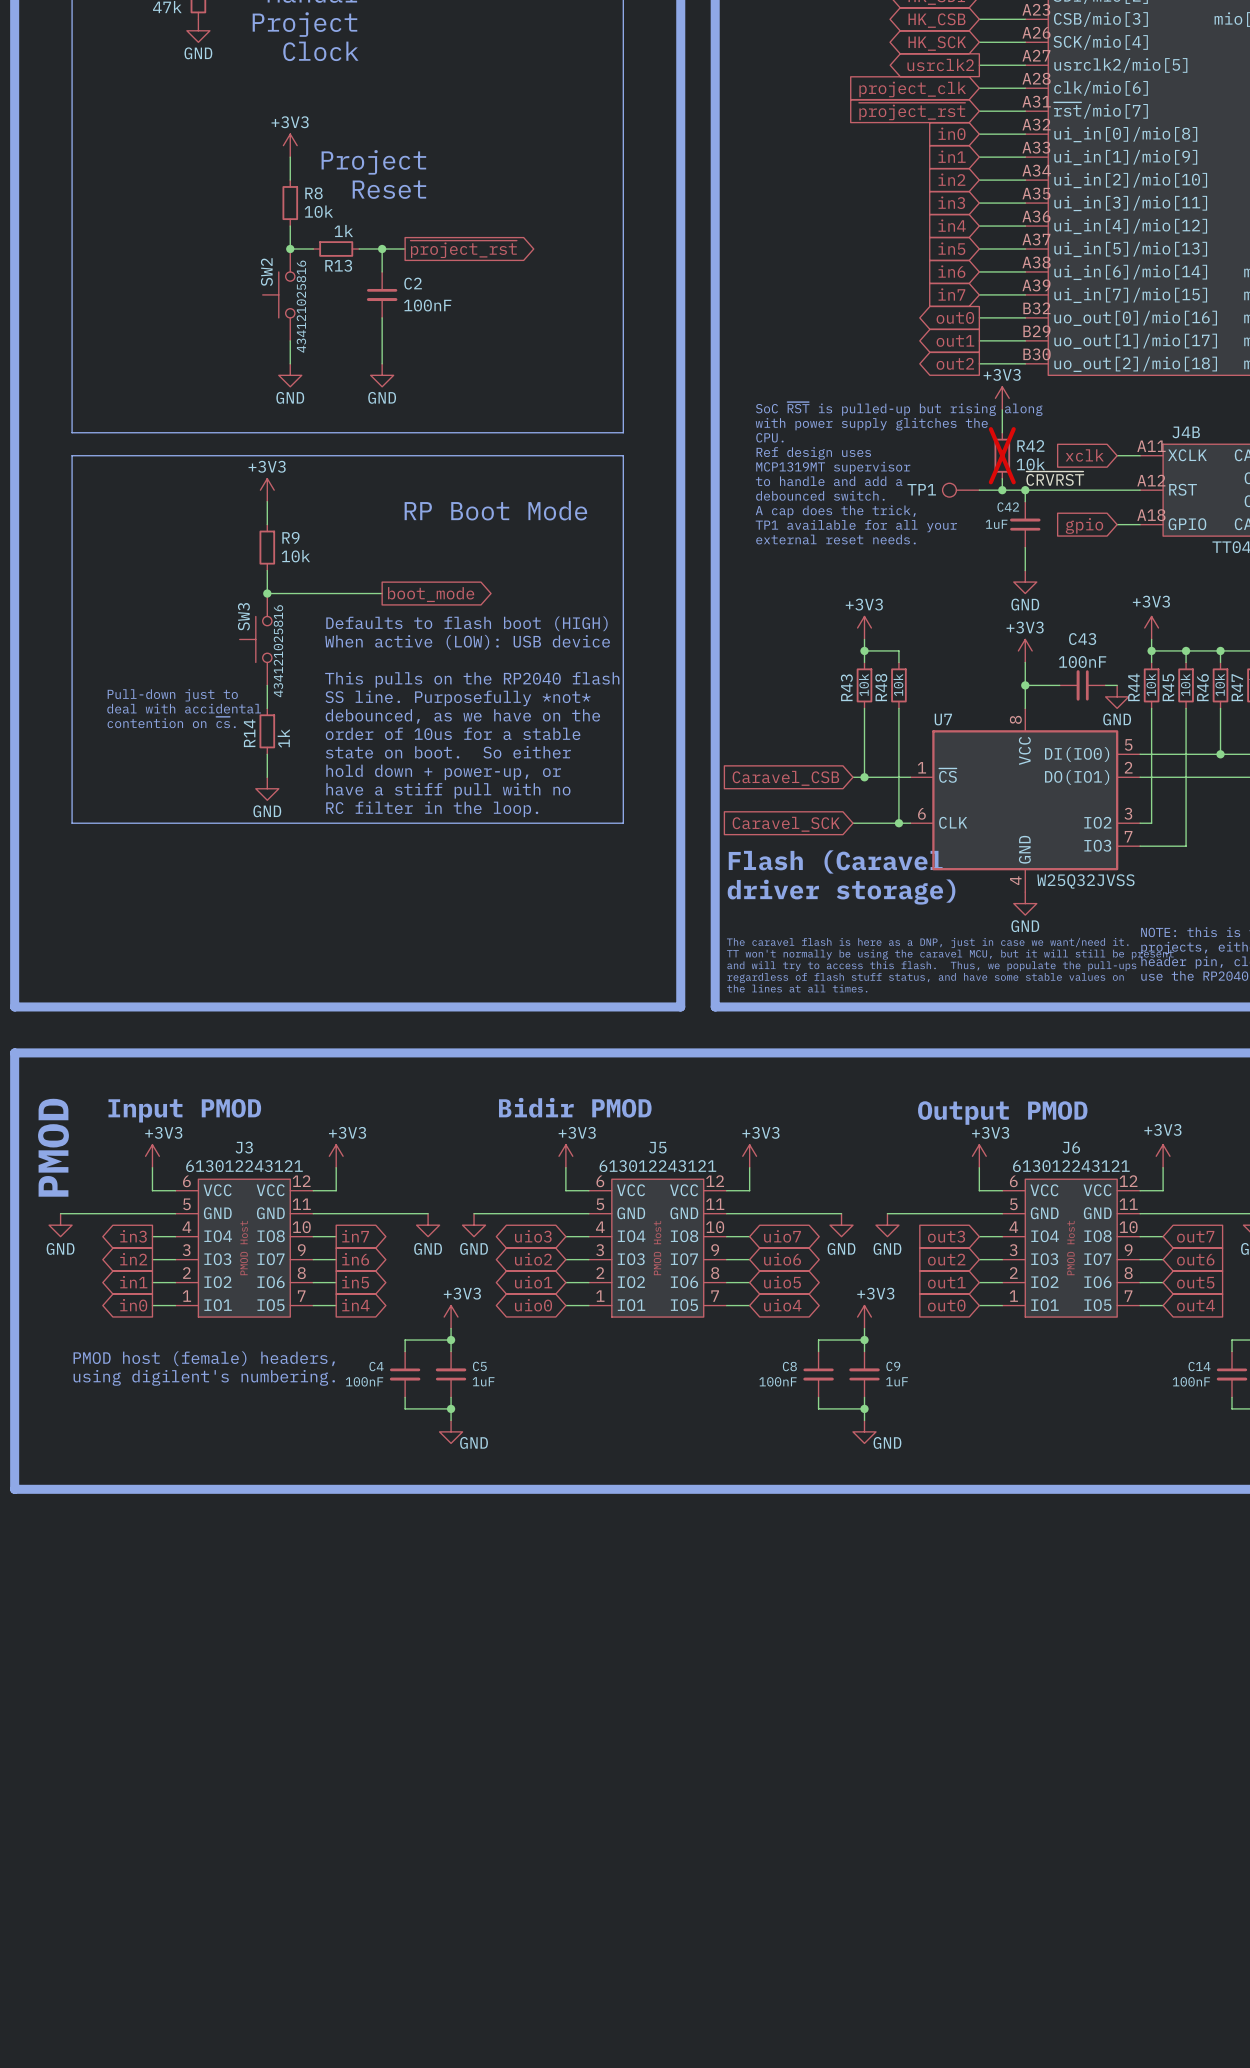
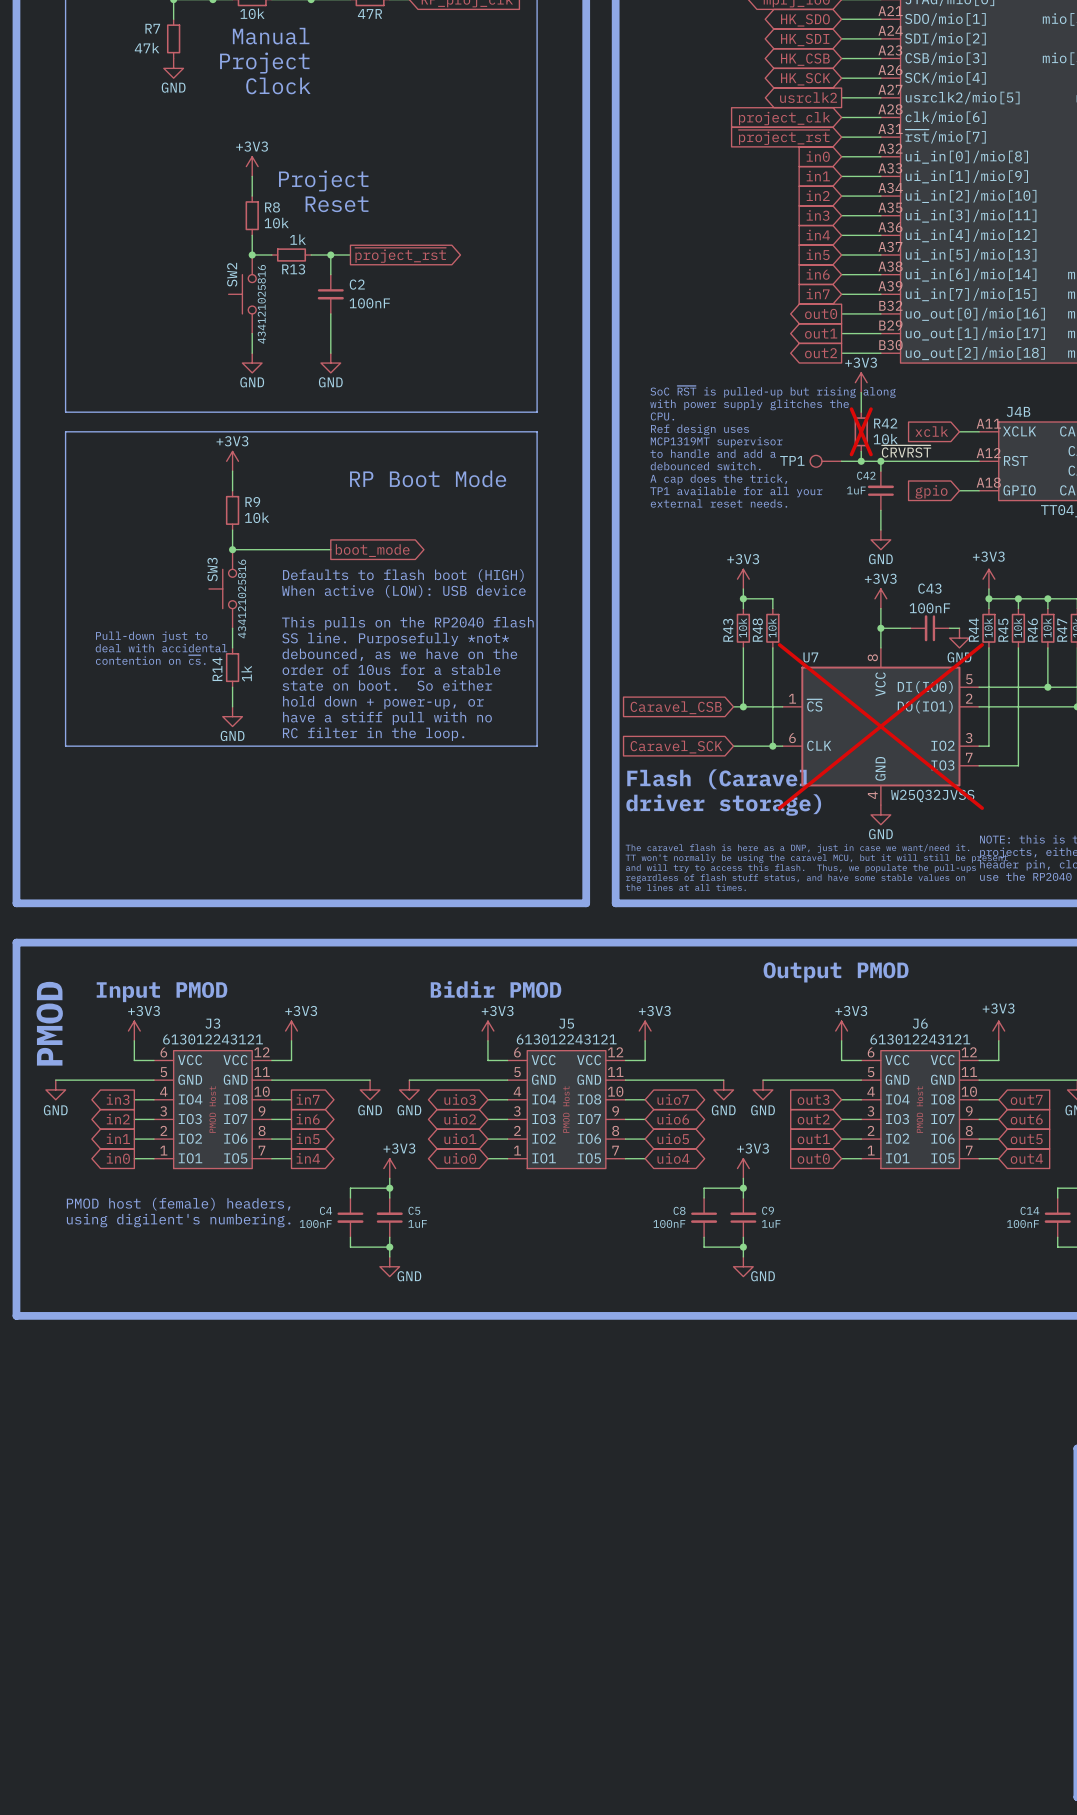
U7 do-not-place cross: none -> (880, 726)
text position: Output PMOD (1002, 1113) -> Output PMOD (836, 972)

